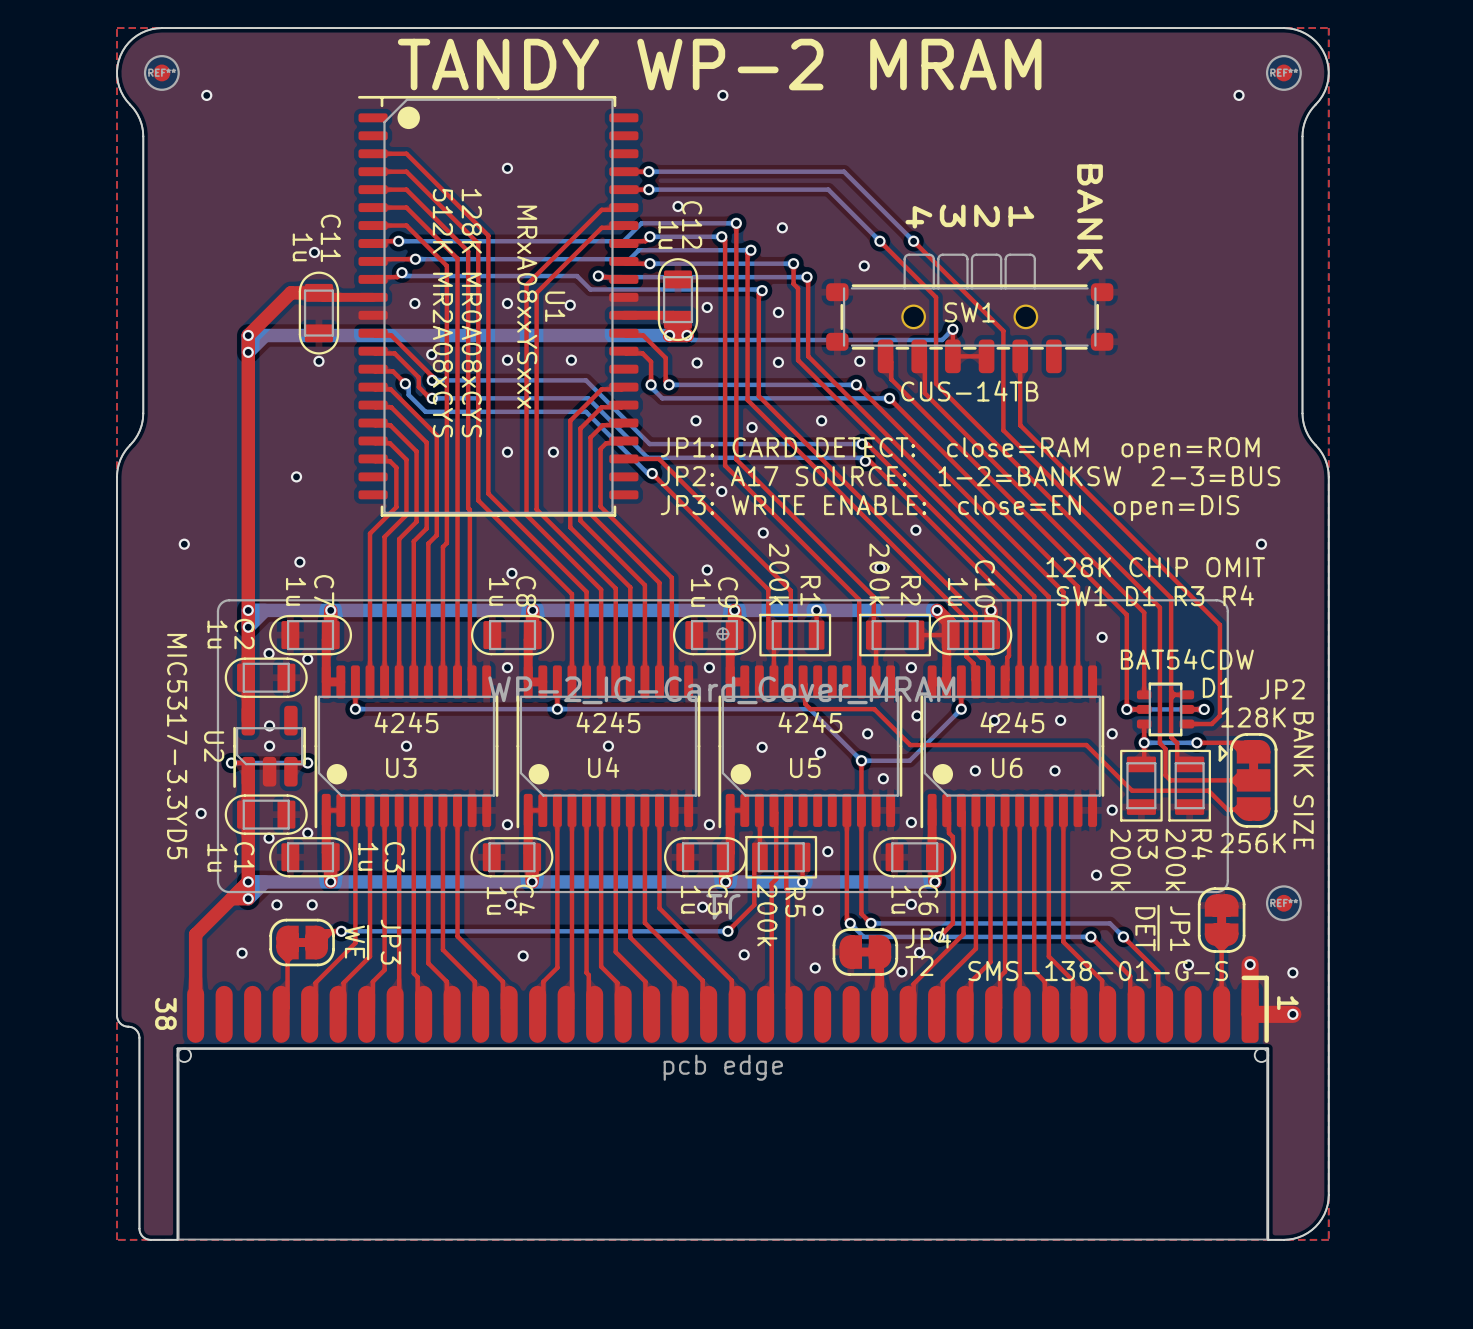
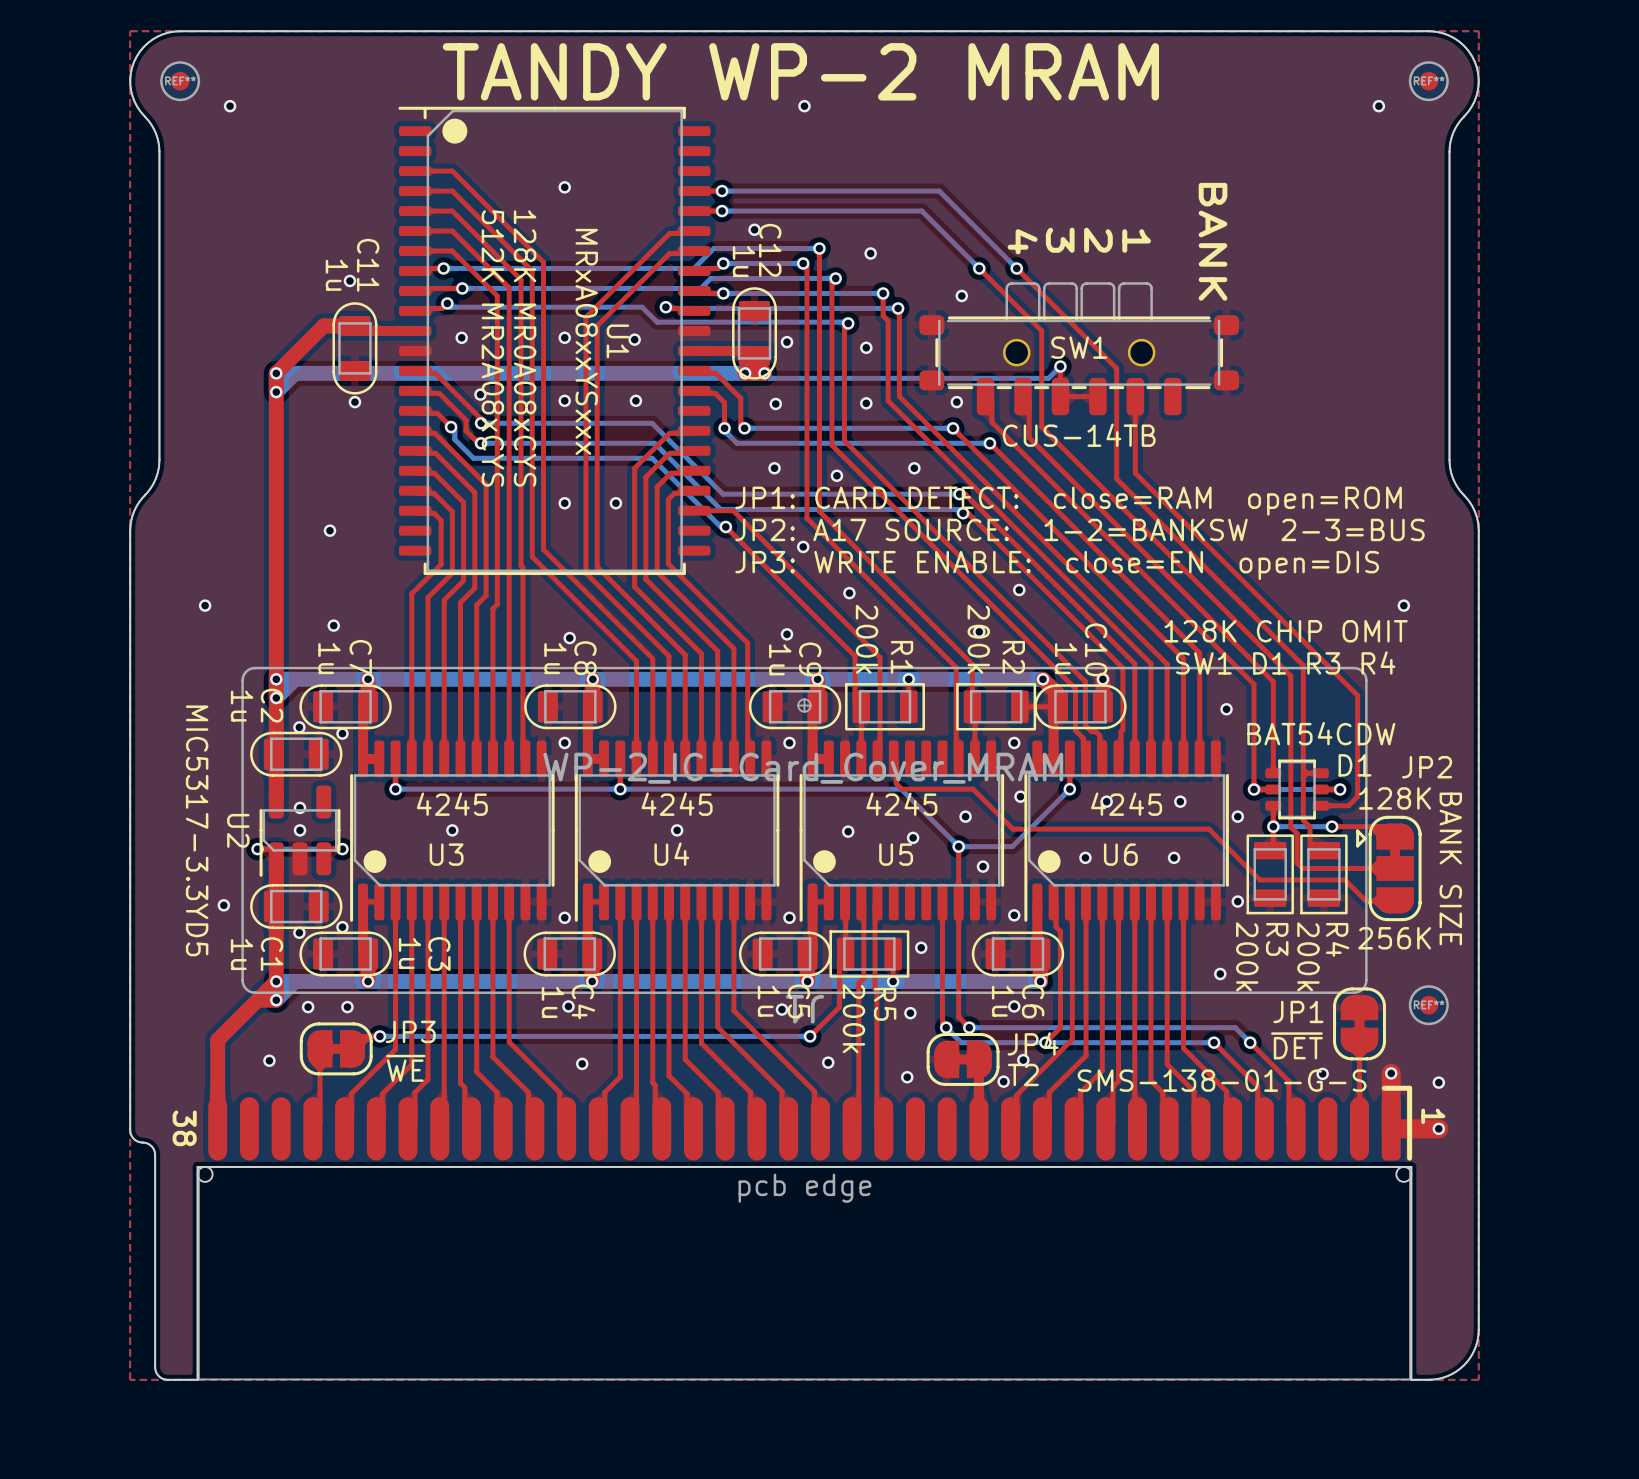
JP1 value rotation: 0° (1147, 927) -> 90° counterclockwise (1296, 1045)
JP1 name rotation: 0° (1180, 928) -> 90° counterclockwise (1298, 1011)
JP3 value rotation: 0° (357, 942) -> 90° counterclockwise (405, 1068)
JP3 name rotation: 0° (390, 942) -> 90° counterclockwise (410, 1031)

